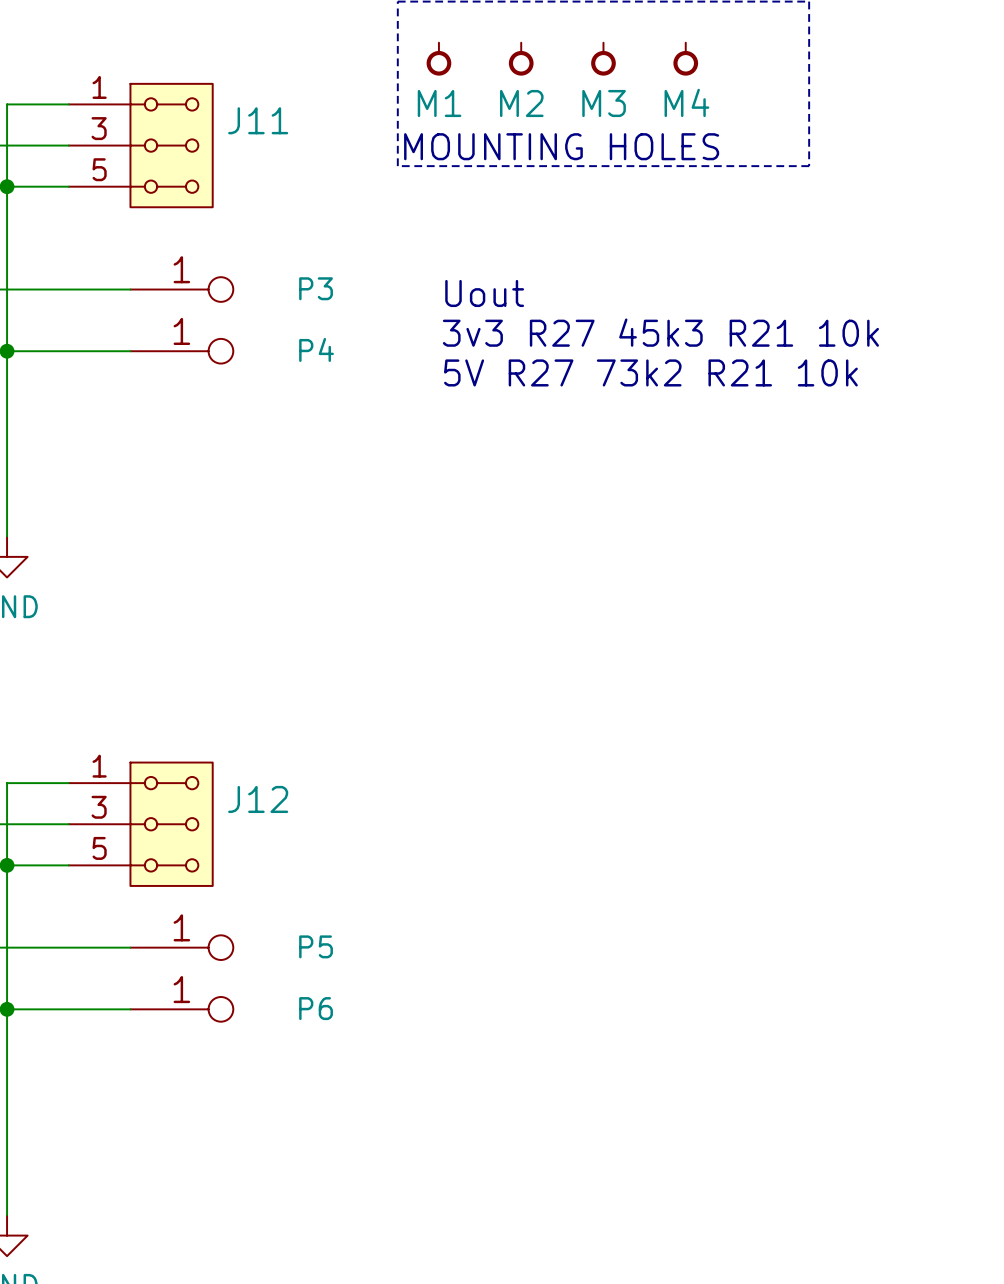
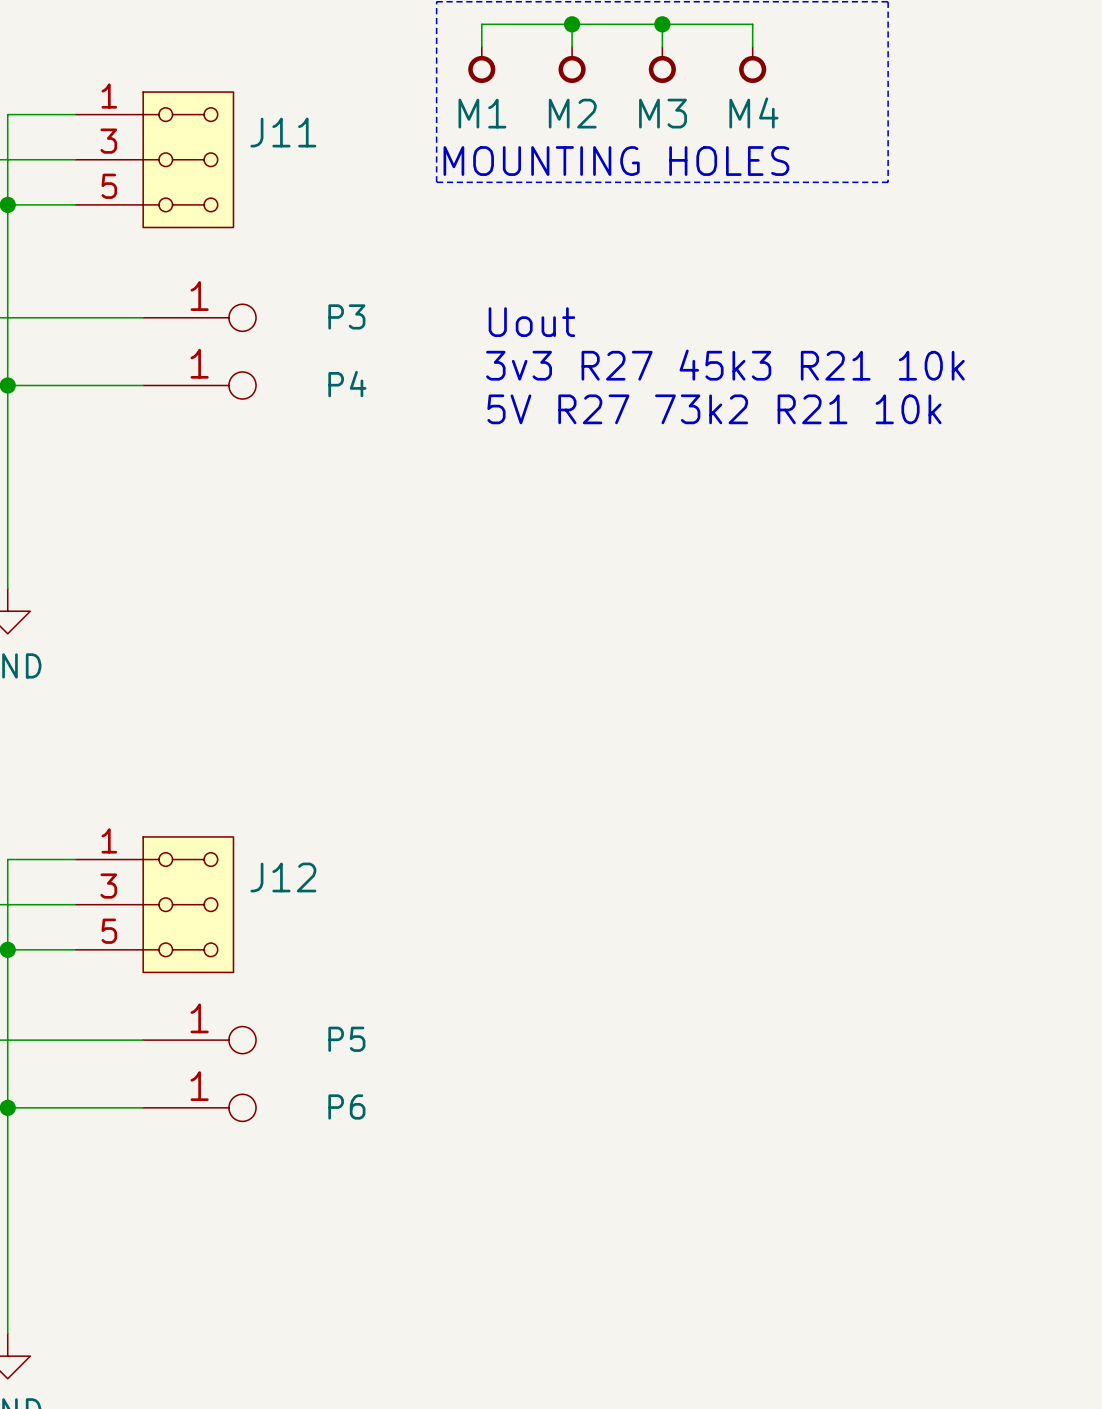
wire: none -> (572, 24) (572, 46)
junction: none -> (572, 24)
wire: none -> (662, 24) (662, 46)
junction: none -> (662, 24)
wire: none -> (481, 46) (481, 24) (752, 24) (752, 46)

